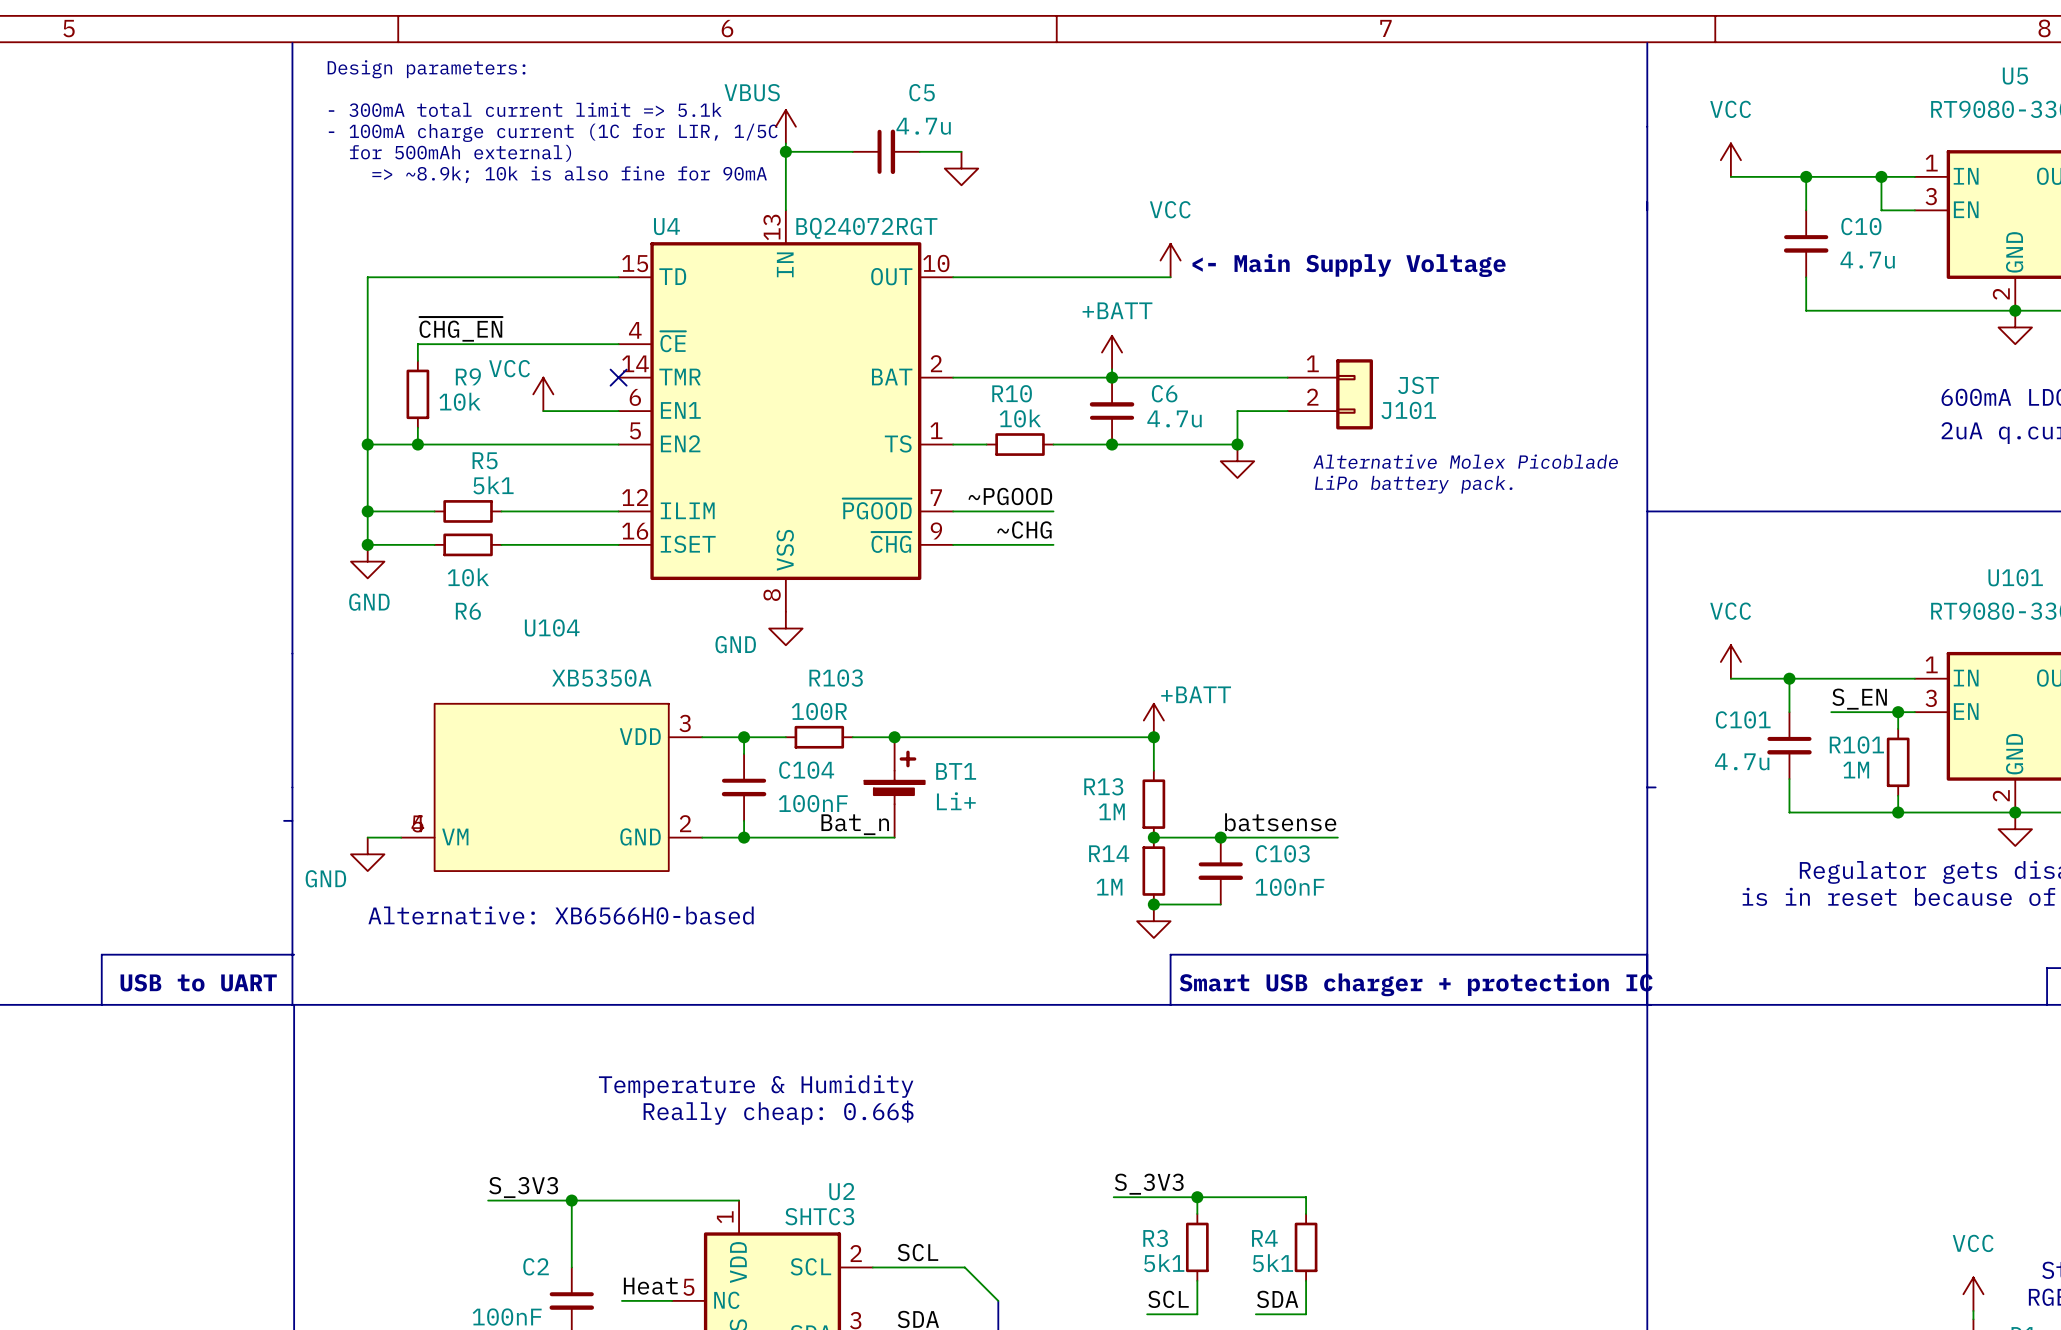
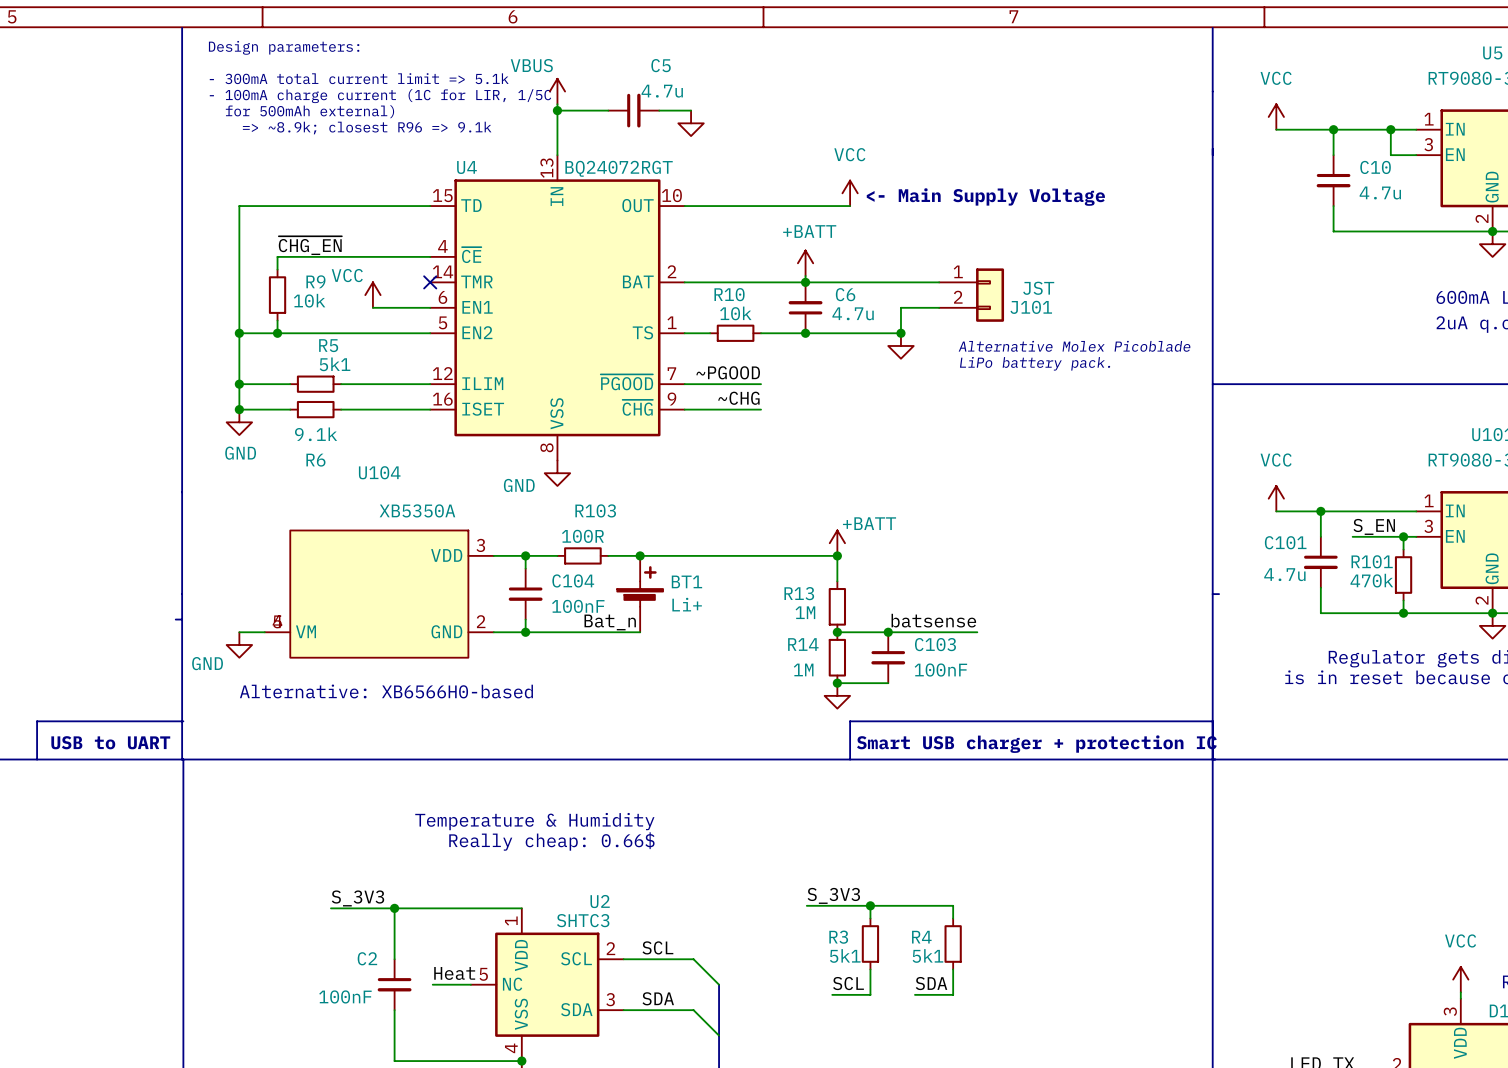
text: => ~8.9k; 10k is also fine for 90mA (569, 174) -> => ~8.9k; closest R96 => 9.1k (367, 128)
R6 value: 10k (468, 577) -> 9.1k (316, 434)
R101 value: 1M (1856, 770) -> 470k (1371, 580)

